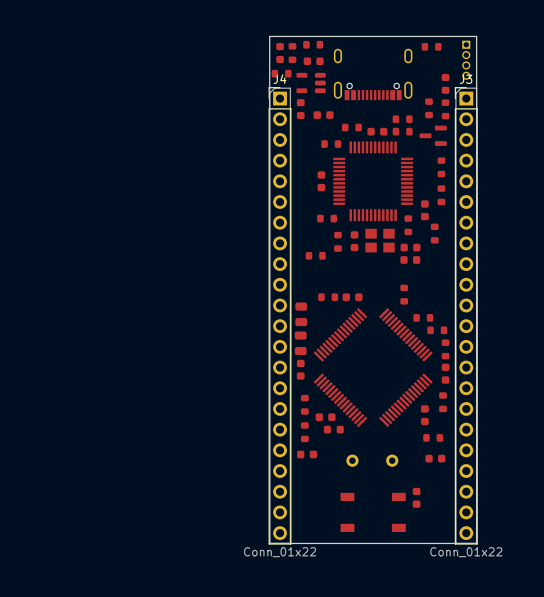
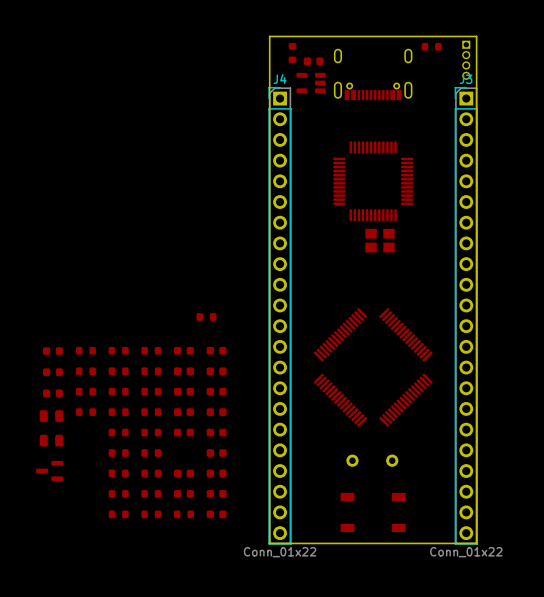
part: (313, 44) -> none
part: (280, 53) -> none
part: (281, 73) -> none
part: (445, 83) -> none
part: (429, 108) -> none
part: (300, 109) -> none
part: (445, 109) -> none
part: (323, 115) -> none
part: (402, 119) -> none
part: (351, 127) -> none
part: (377, 131) -> none
part: (402, 131) -> none
part: (433, 135) -> none
part: (331, 144) -> none
part: (441, 167) -> none
part: (321, 181) -> none
part: (441, 195) -> none
part: (424, 210) -> none
part: (327, 218) -> none
part: (408, 225) -> none
part: (434, 233) -> none
part: (337, 241) -> none
part: (354, 241) -> none
part: (410, 247) -> none
part: (315, 255) -> none
part: (410, 259) -> none
part: (404, 294) -> none
part: (328, 297) -> none
part: (352, 297) -> none
part: (301, 314) -> none
part: none -> (206, 317)
part: (423, 317) -> none
part: (437, 330) -> none
part: (300, 343) -> none
part: (445, 349) -> none
part: none -> (85, 350)
part: none -> (118, 350)
part: none -> (151, 350)
part: none -> (183, 350)
part: none -> (216, 350)
part: none -> (52, 351)
part: (300, 369) -> none
part: none -> (85, 371)
part: none -> (118, 371)
part: none -> (151, 371)
part: none -> (183, 371)
part: none -> (216, 371)
part: none -> (52, 372)
part: (445, 373) -> none
part: none -> (85, 391)
part: none -> (118, 391)
part: none -> (151, 391)
part: none -> (183, 391)
part: none -> (216, 391)
part: none -> (52, 393)
part: (443, 402) -> none
part: (304, 404) -> none
part: none -> (85, 412)
part: none -> (118, 412)
part: none -> (151, 412)
part: none -> (183, 412)
part: none -> (216, 412)
part: (424, 415) -> none
part: none -> (51, 416)
part: (325, 417) -> none
part: (333, 429) -> none
part: none -> (118, 432)
part: none -> (151, 432)
part: none -> (183, 432)
part: none -> (216, 432)
part: (304, 432) -> none
part: (433, 437) -> none
part: none -> (51, 440)
part: none -> (118, 453)
part: none -> (151, 453)
part: none -> (216, 453)
part: (307, 454) -> none
part: (435, 458) -> none
part: none -> (49, 471)
part: none -> (118, 473)
part: none -> (151, 473)
part: none -> (183, 473)
part: none -> (216, 473)
part: none -> (118, 493)
part: none -> (151, 493)
part: none -> (183, 493)
part: none -> (216, 493)
part: (416, 497) -> none
part: none -> (118, 514)
part: none -> (151, 514)
part: none -> (183, 514)
part: none -> (216, 514)

